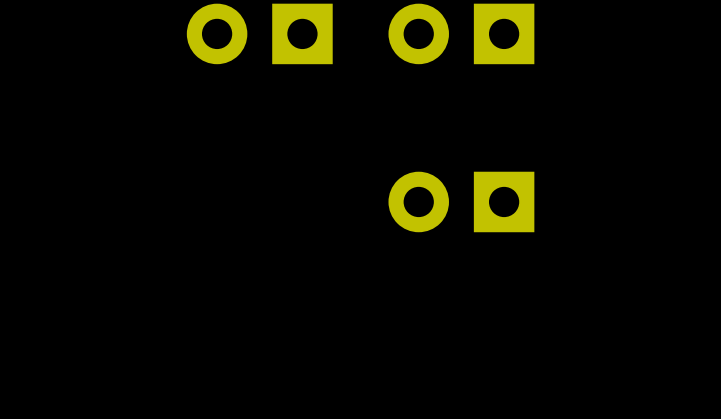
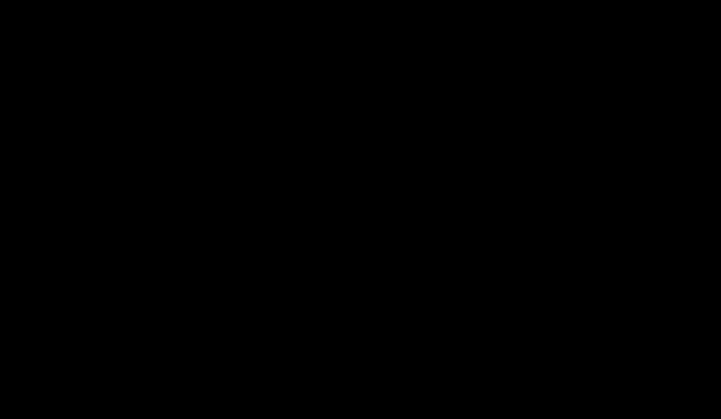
part: (259, 33) -> none
part: (461, 33) -> none
part: (461, 201) -> none

